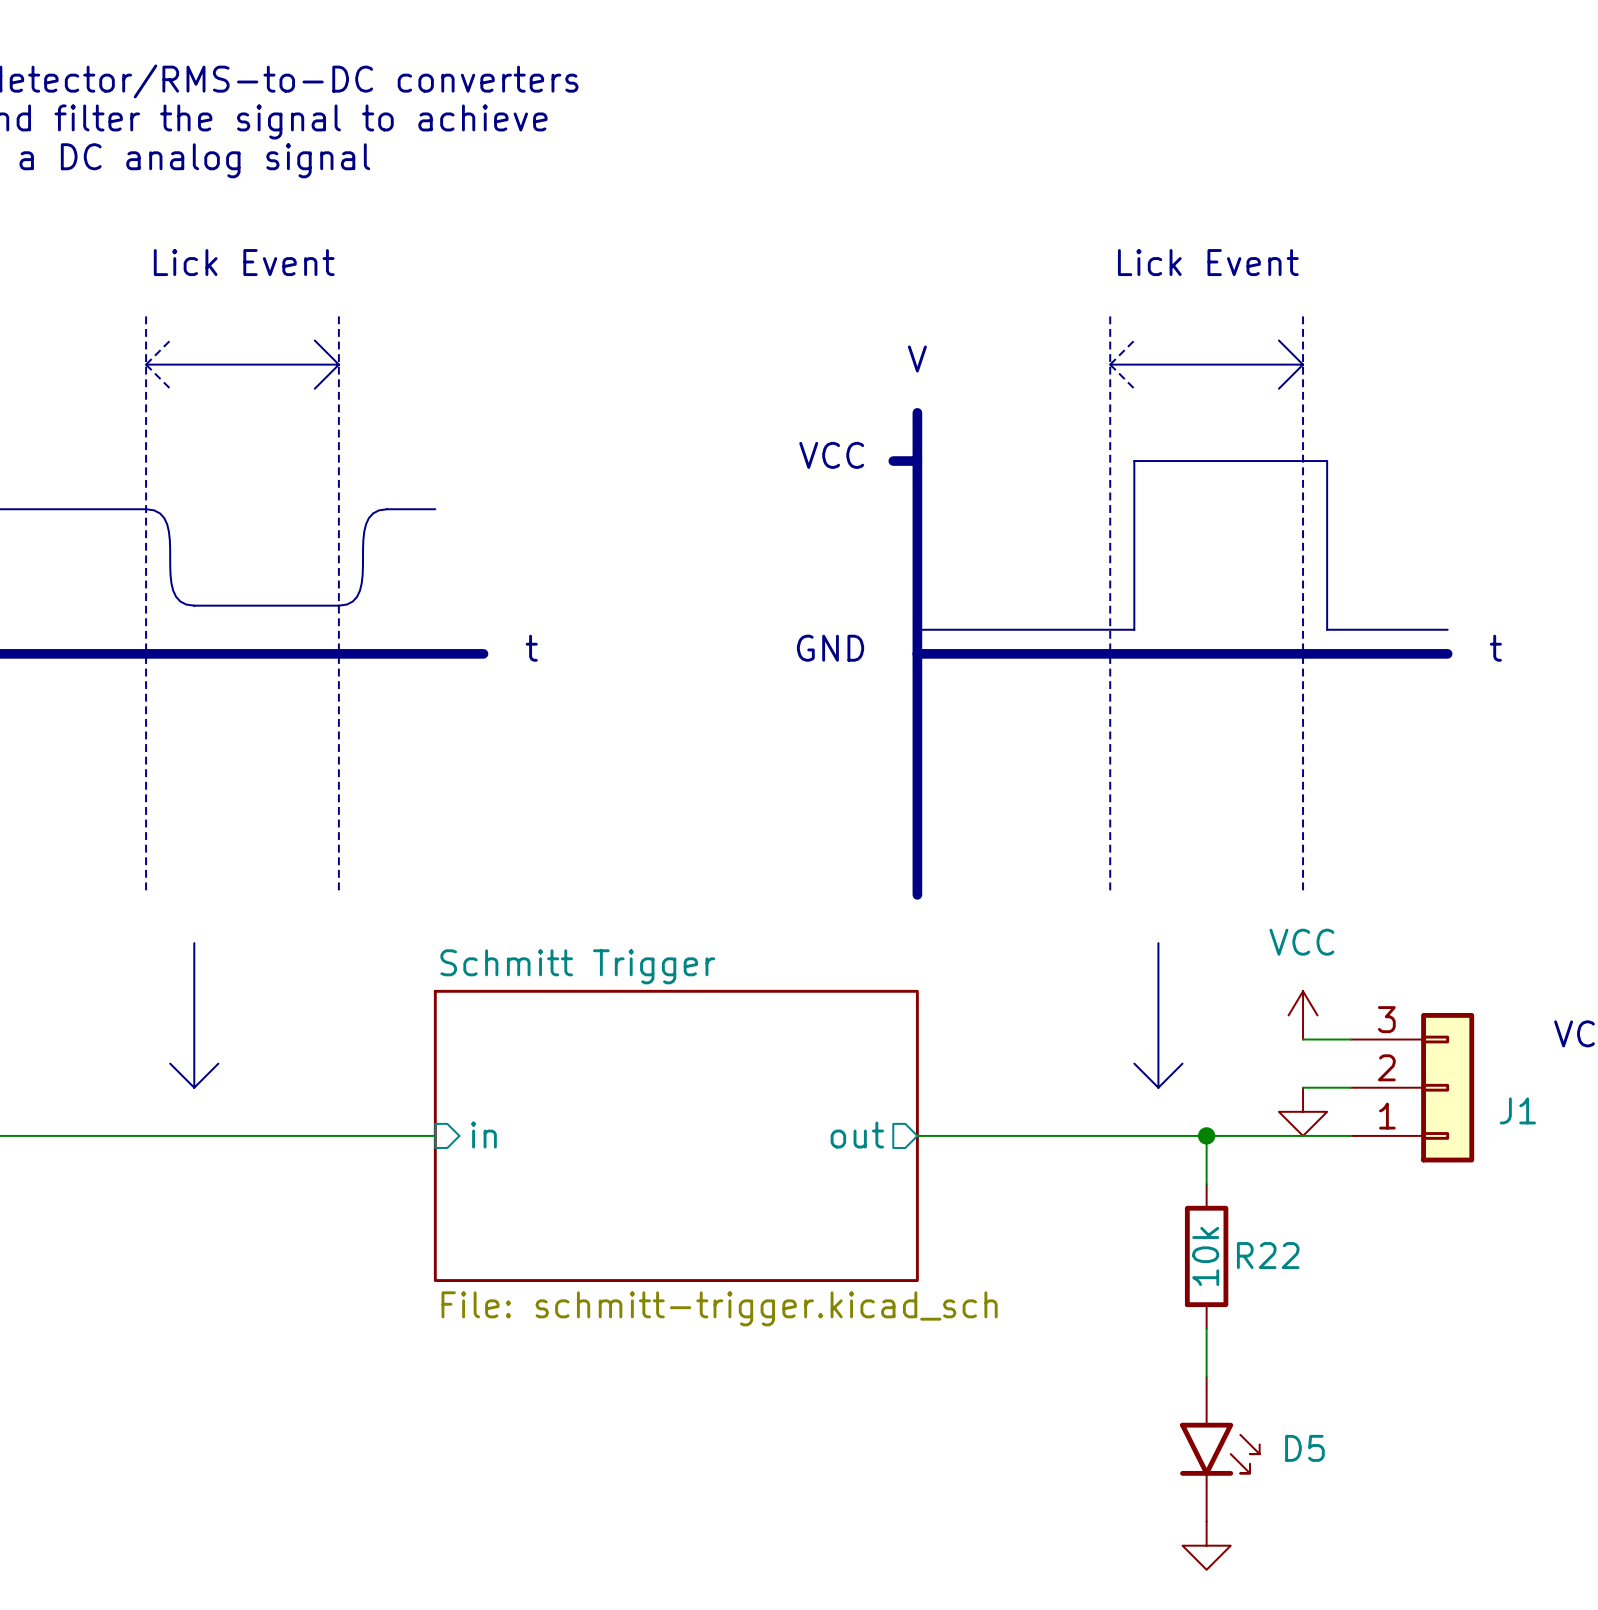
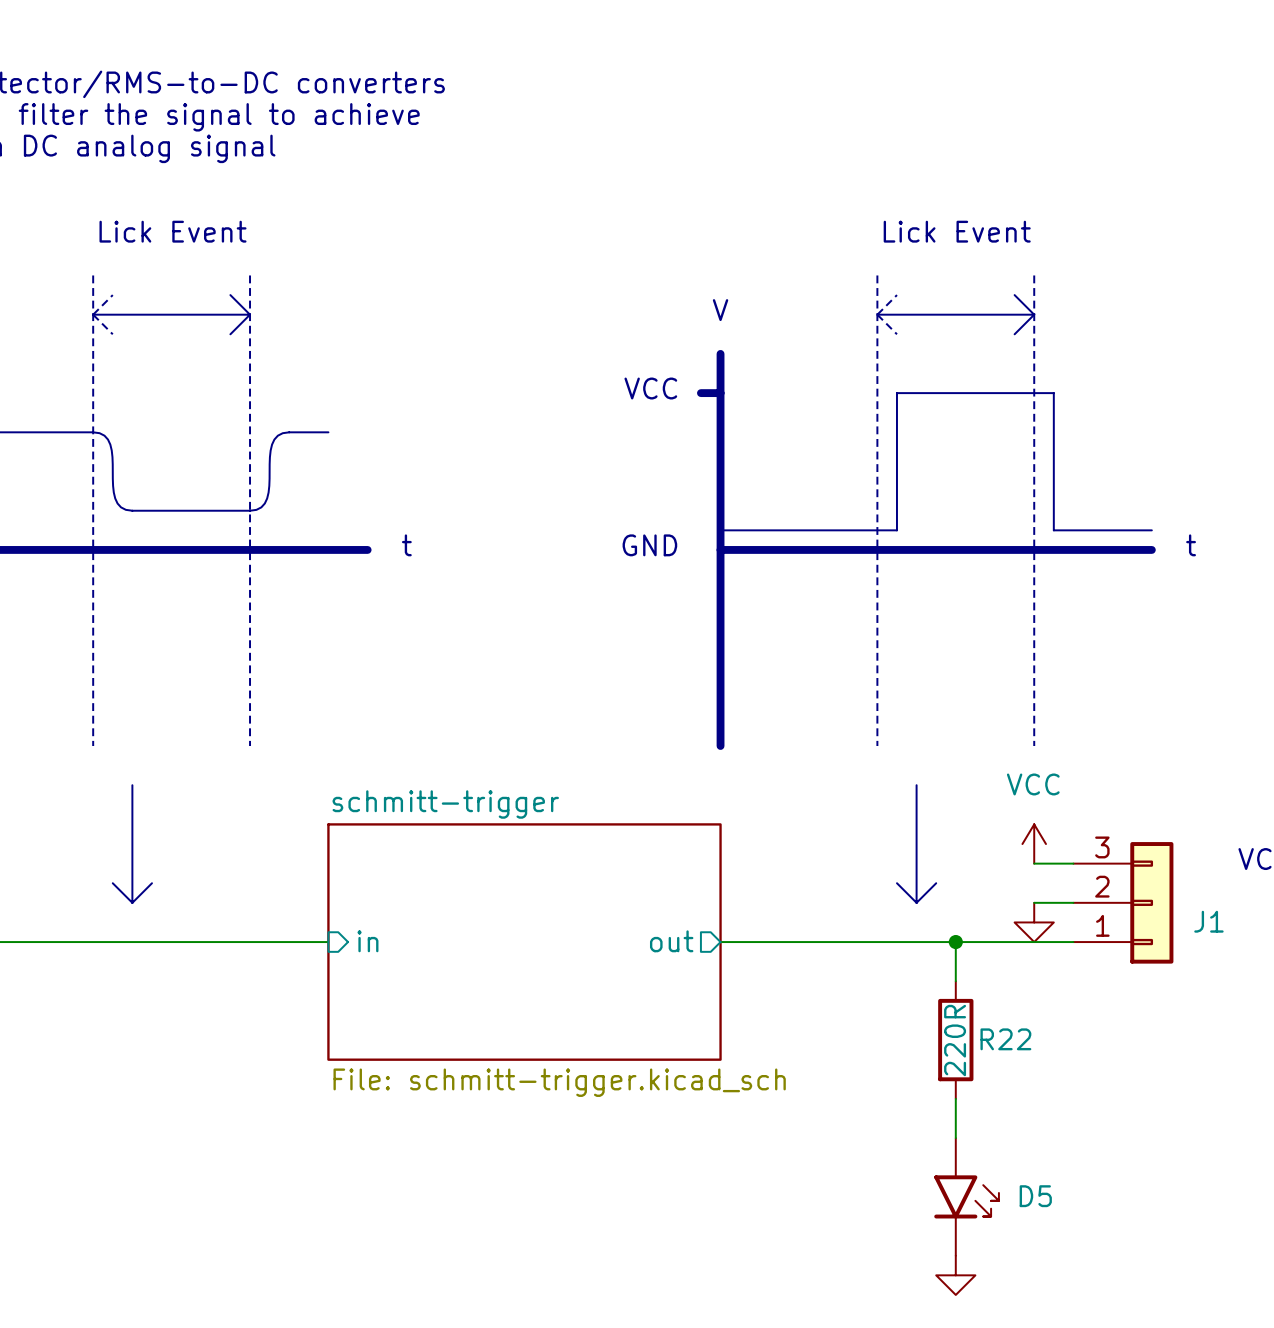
sheet Schmitt Trigger name: Schmitt Trigger (577, 966) -> schmitt-trigger (445, 804)
R22 value: 10k (1205, 1256) -> 220R (955, 1040)

